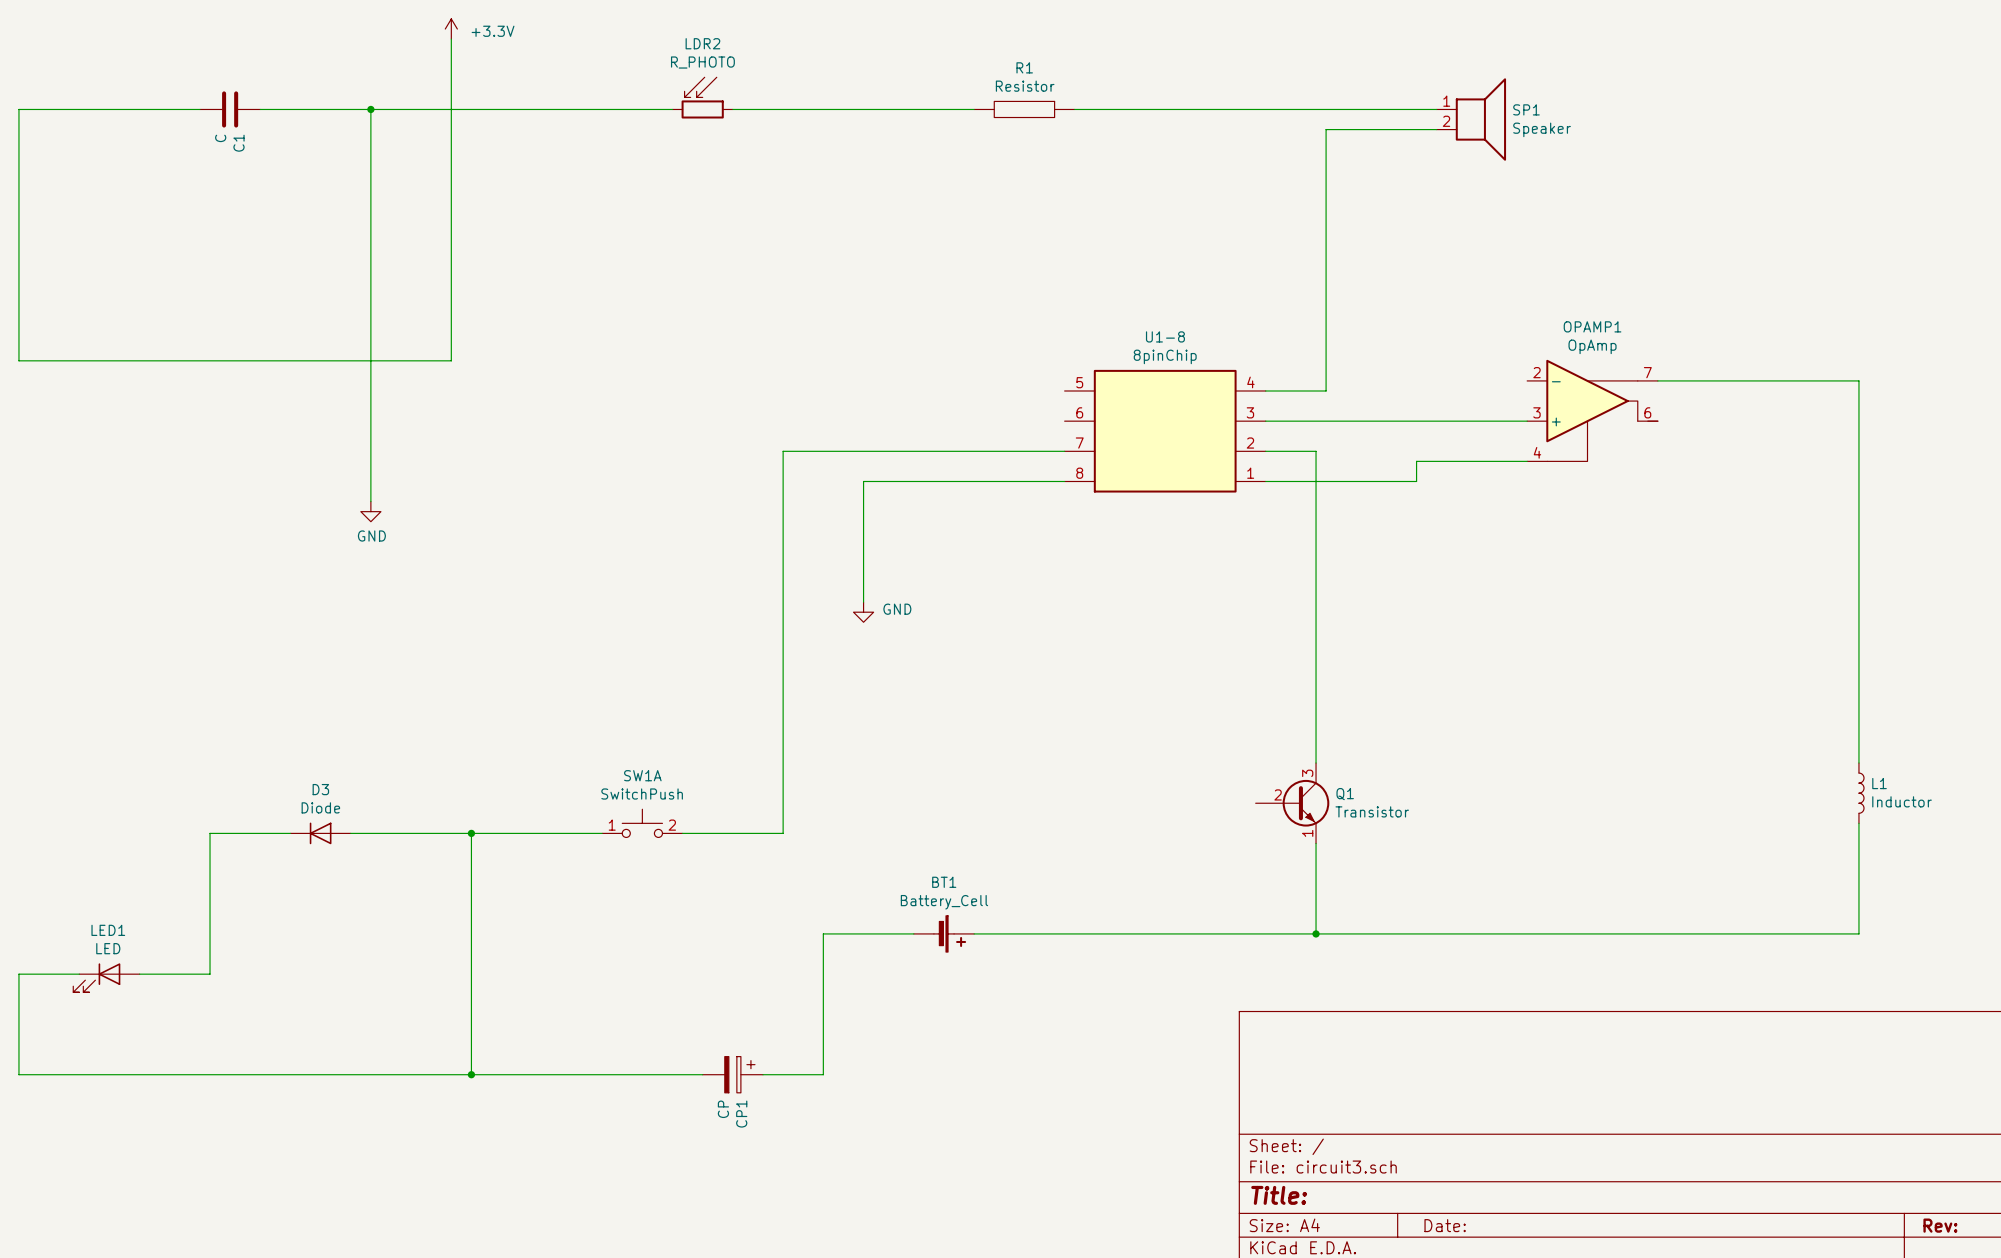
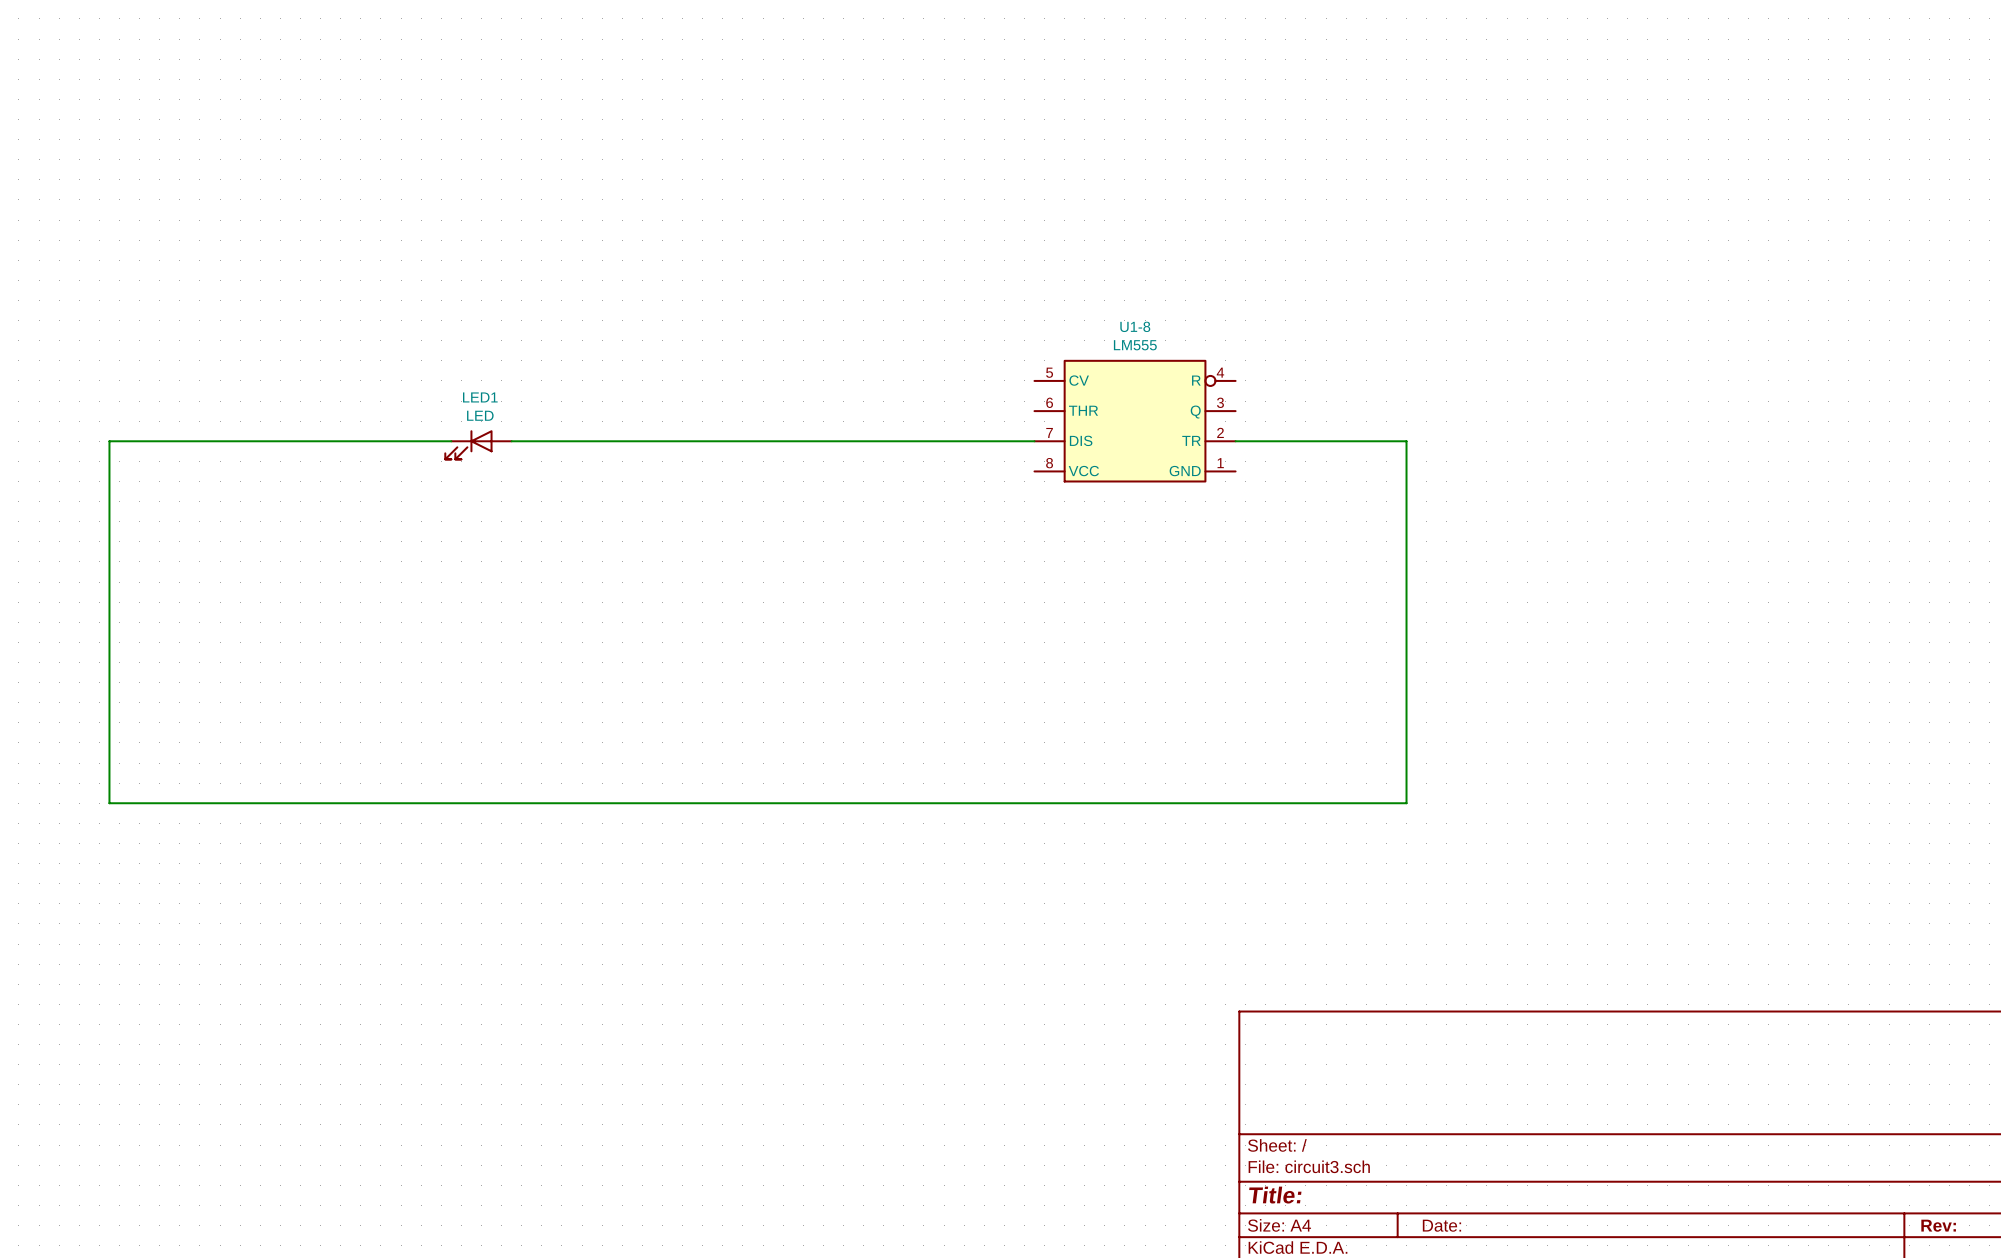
power symbol: +3.3V (451, 29) -> none
wire: (451, 39) (451, 360) (18, 360) (18, 109) (199, 109) -> none
LDR2: R_PHOTO (702, 97) -> none
C1: C (230, 109) -> none
wire: (260, 109) (672, 109) -> none
wire: (370, 109) (370, 501) -> none
junction: (370, 109) -> none
wire: (732, 109) (974, 109) -> none
R1: Resistor (1024, 109) -> none
wire: (1074, 109) (1436, 109) -> none
SP1: Speaker (1471, 119) -> none
wire: (1436, 129) (1326, 129) (1326, 390) (1265, 390) -> none
U1-8 value: 8pinChip (1165, 356) -> LM555 (1135, 345)
U1-8 symbol: [1064, 369, 1266, 493] -> [1034, 359, 1236, 483]
wire: (1657, 380) (1858, 380) (1858, 763) -> none
OPAMP1: OpAmp (1592, 410) -> none
wire: (1265, 421) (1527, 421) -> none
wire: none -> (451, 441) (109, 441) (109, 803) (1406, 803) (1406, 441) (1235, 441)
wire: none -> (511, 441) (1034, 441)
wire: (1064, 451) (783, 451) (783, 833) (682, 833) -> none
wire: (1265, 451) (1316, 451) (1316, 763) -> none
wire: (1527, 461) (1416, 461) (1416, 481) (1265, 481) -> none
wire: (1064, 481) (863, 481) (863, 602) -> none
power symbol: GND (370, 511) -> none
power symbol: GND (863, 612) -> none
L1: Inductor (1861, 793) -> none
Q1: Transistor (1292, 803) -> none
SW1A: SwitchPush (642, 823) -> none
wire: (1858, 823) (1858, 933) (974, 933) -> none
wire: (290, 833) (210, 833) (210, 974) (139, 974) -> none
D3: Diode (320, 833) -> none
wire: (350, 833) (602, 833) -> none
wire: (471, 833) (471, 1074) -> none
junction: (471, 833) -> none
wire: (1316, 843) (1316, 933) -> none
wire: (913, 933) (823, 933) (823, 1074) (763, 1074) -> none
BT1: Battery_Cell (944, 933) -> none
junction: (1316, 933) -> none
wire: (79, 974) (18, 974) (18, 1074) (702, 1074) -> none
LED1 position: (106, 977) -> (478, 444)
junction: (471, 1074) -> none
CP1: CP (732, 1074) -> none

